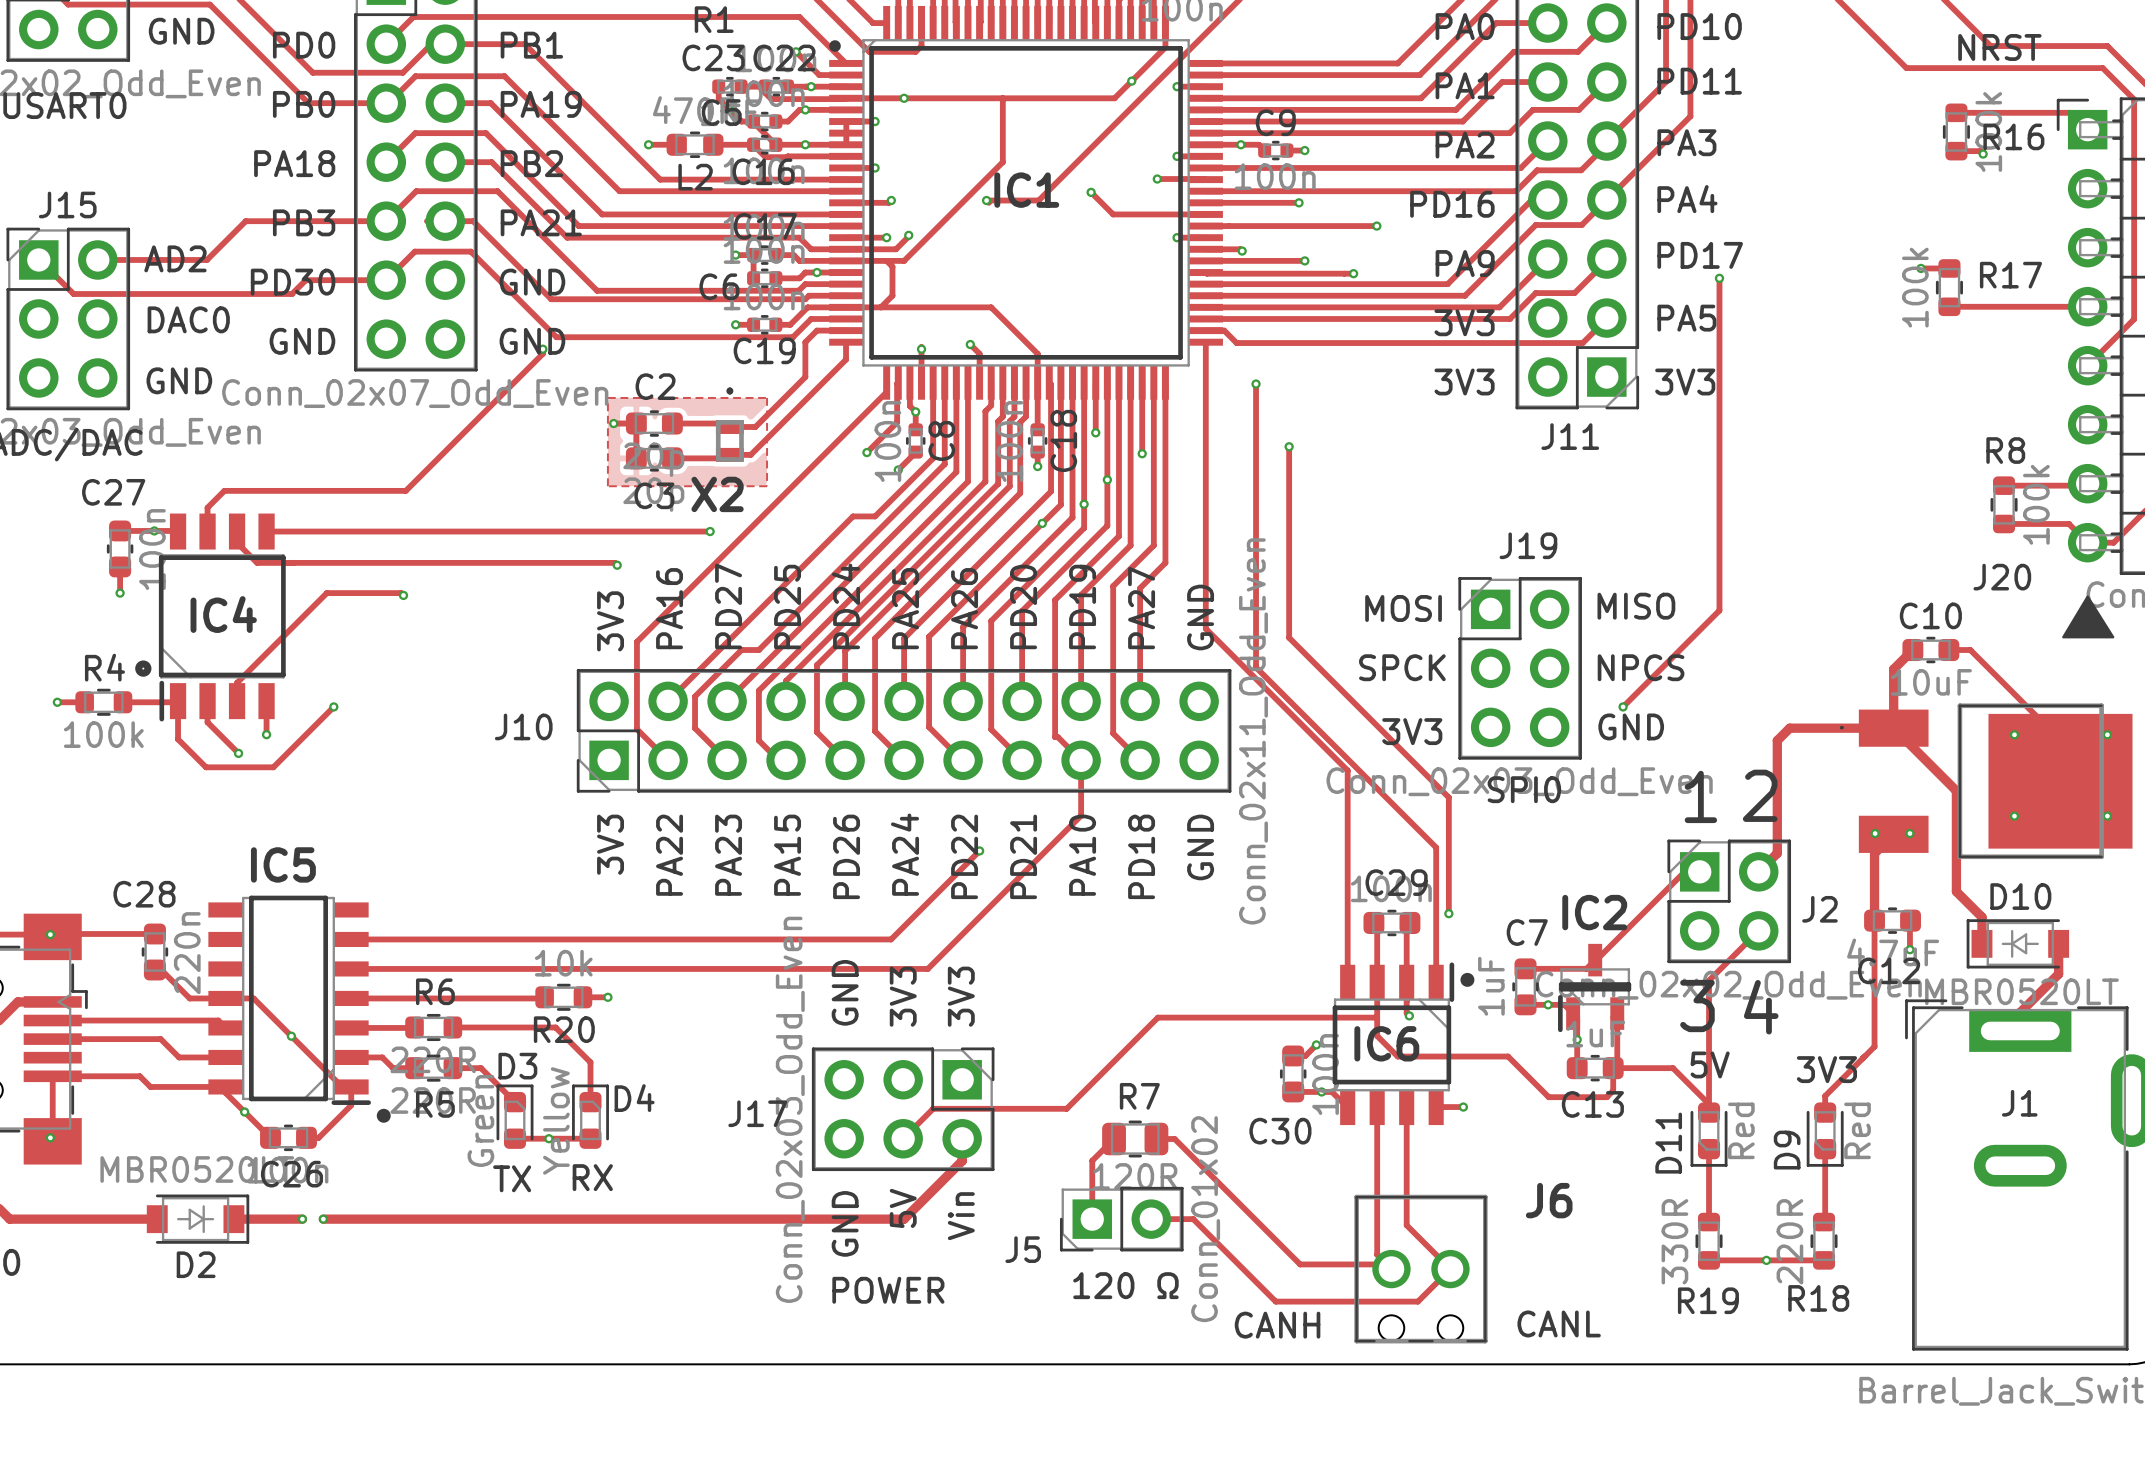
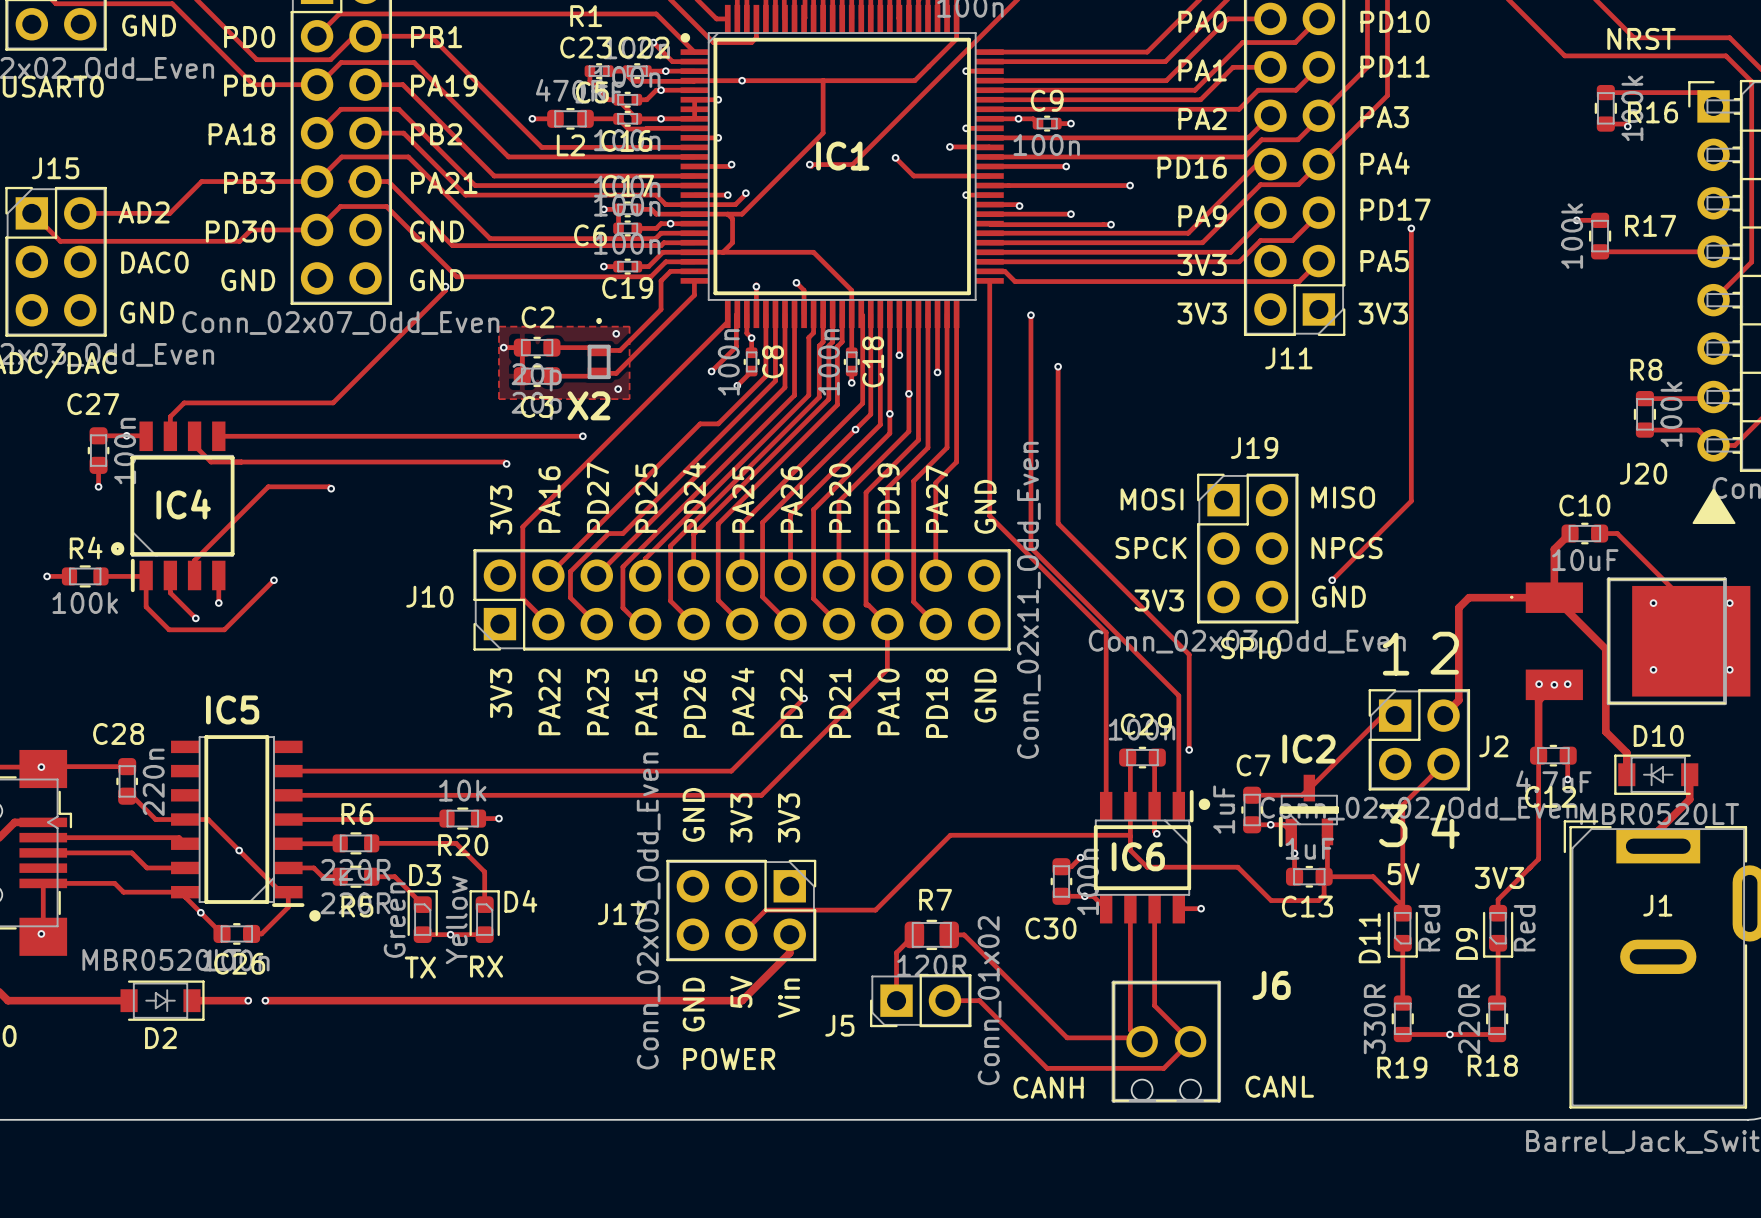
via: (1131, 81) -> none
via: none -> (616, 333)
via: none -> (618, 389)
via: none -> (1554, 684)
text: 120 Ω (1125, 1285) -> none

